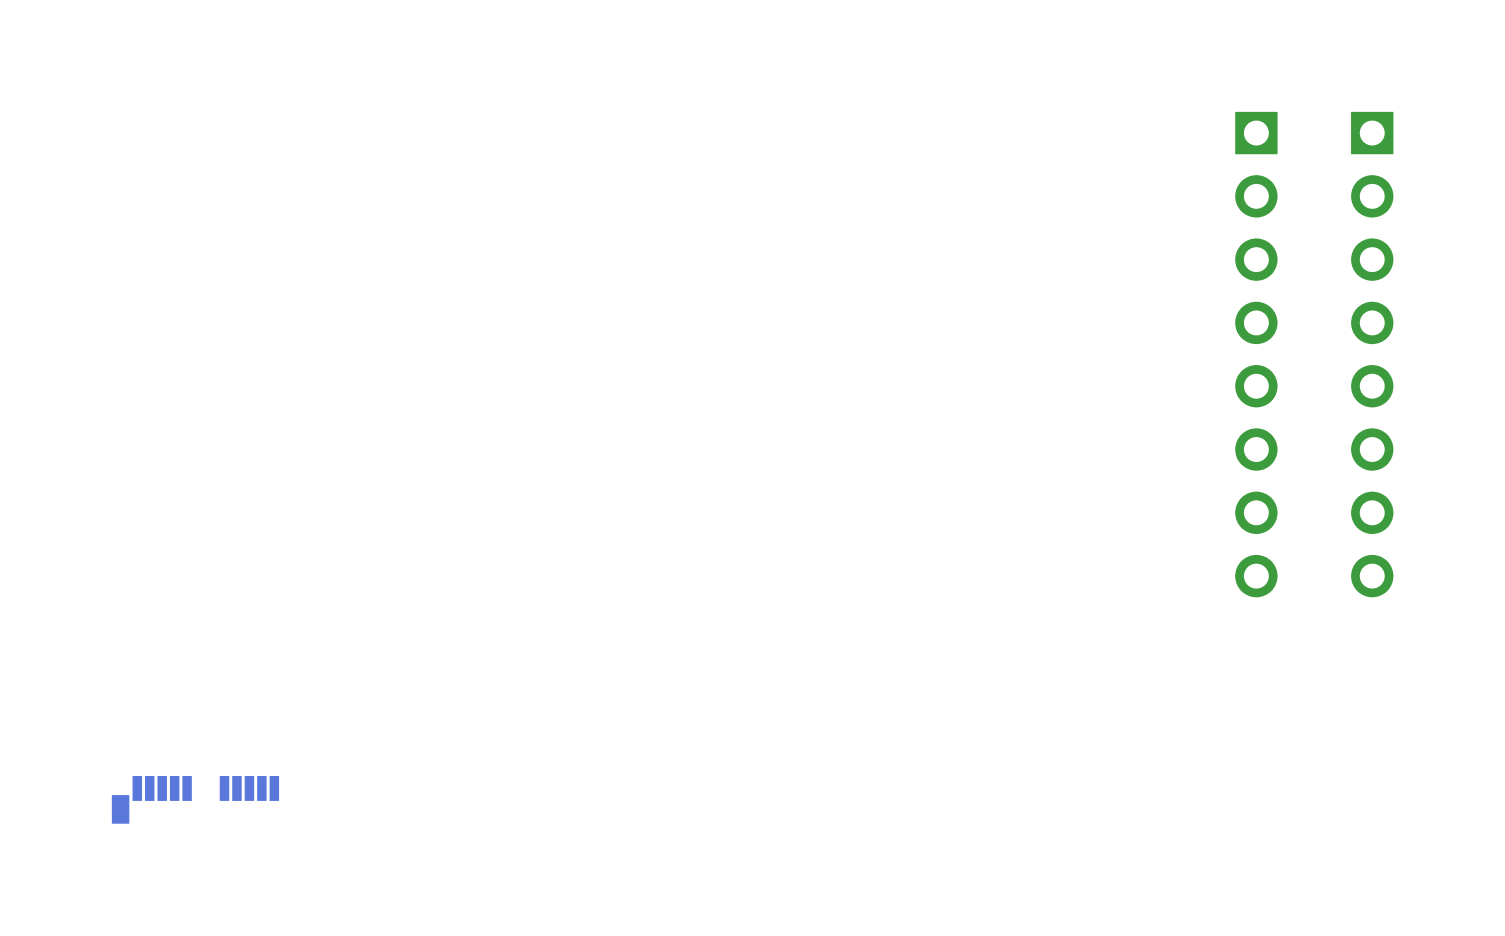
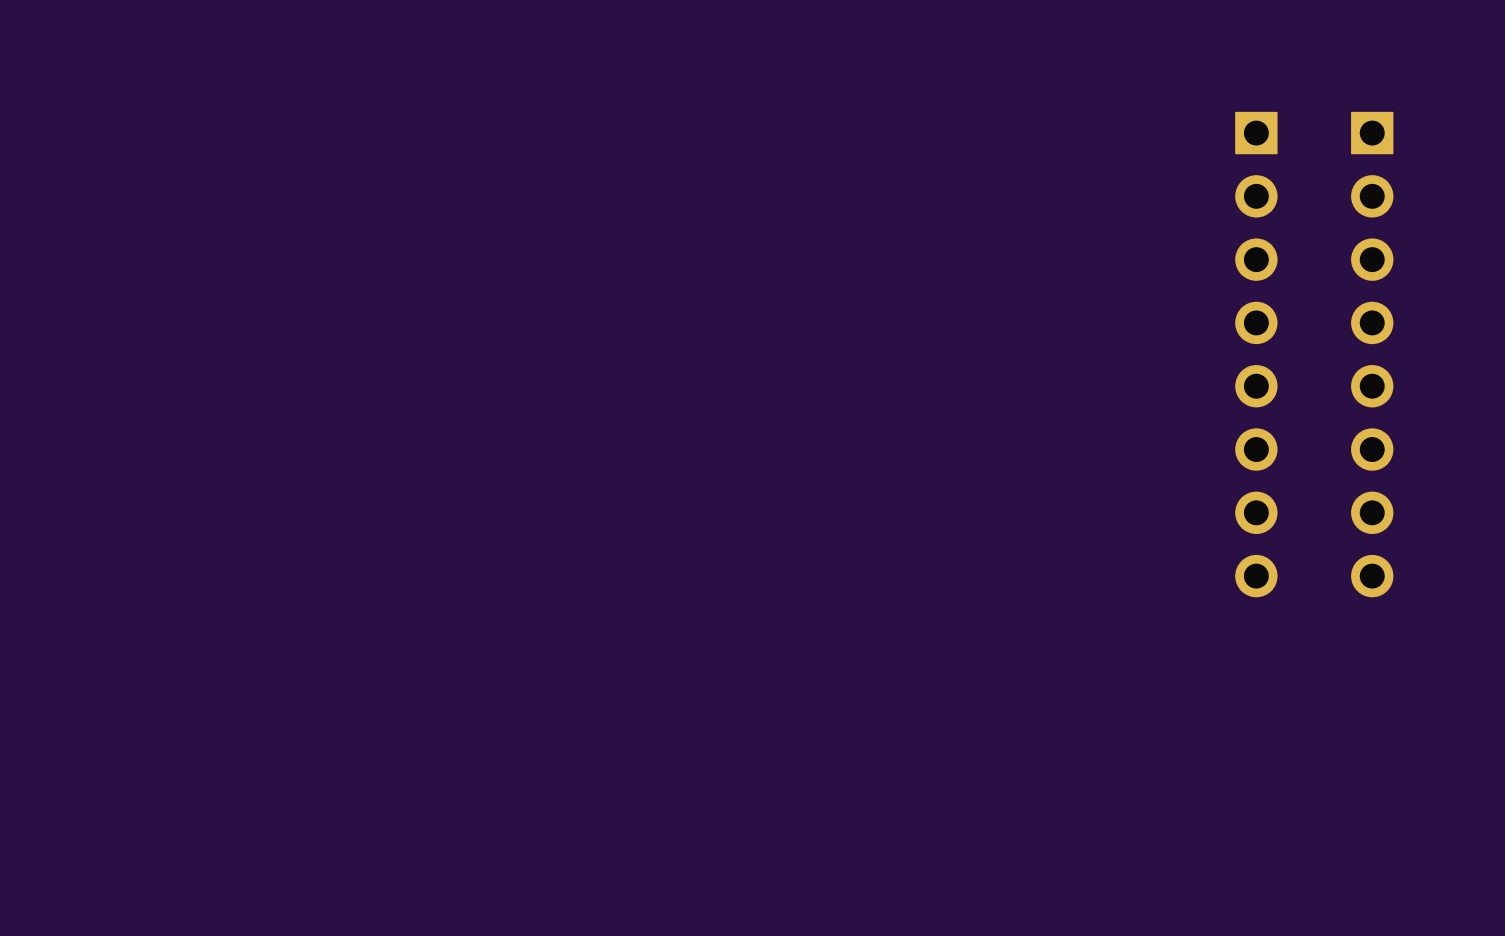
part: (195, 799) -> none

